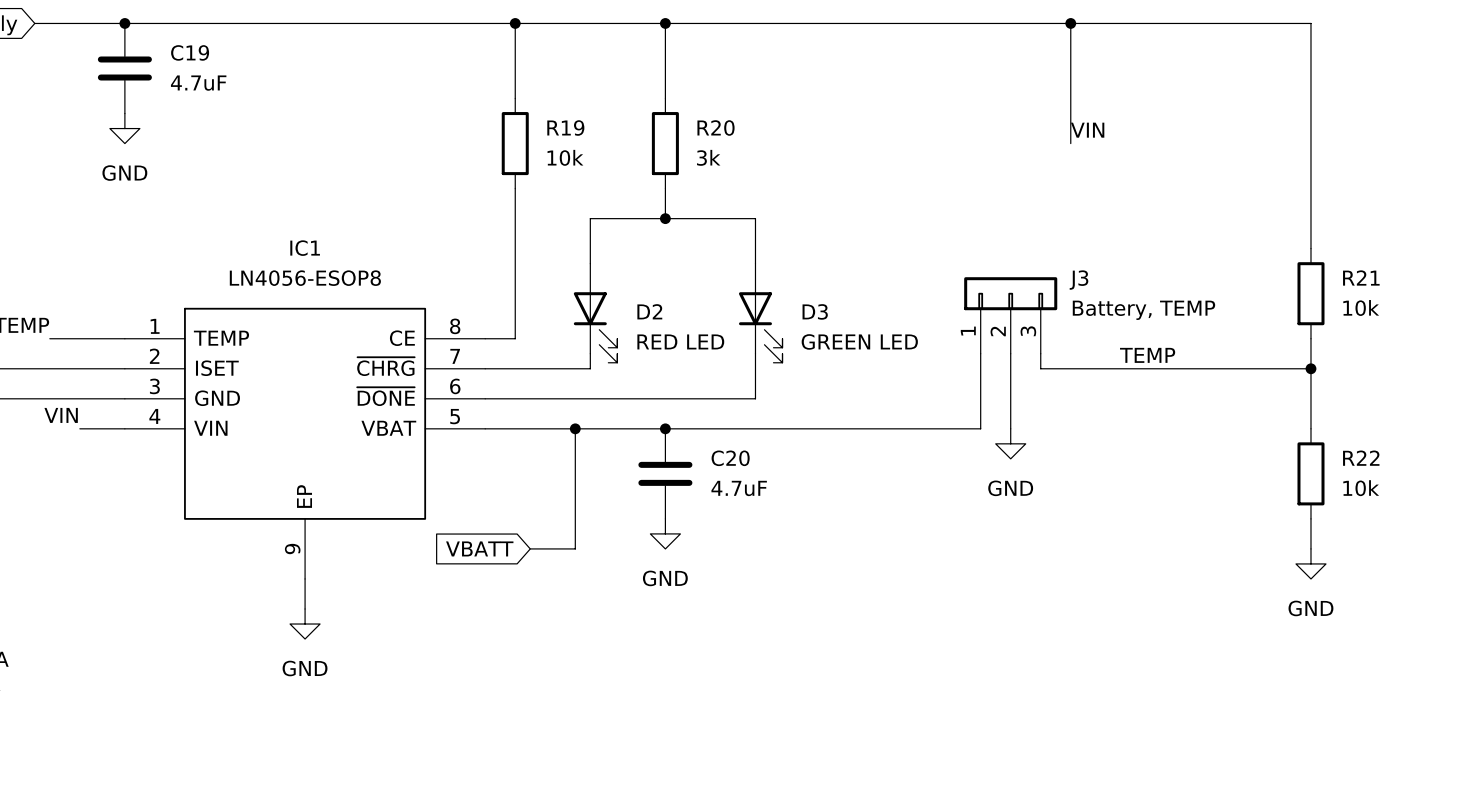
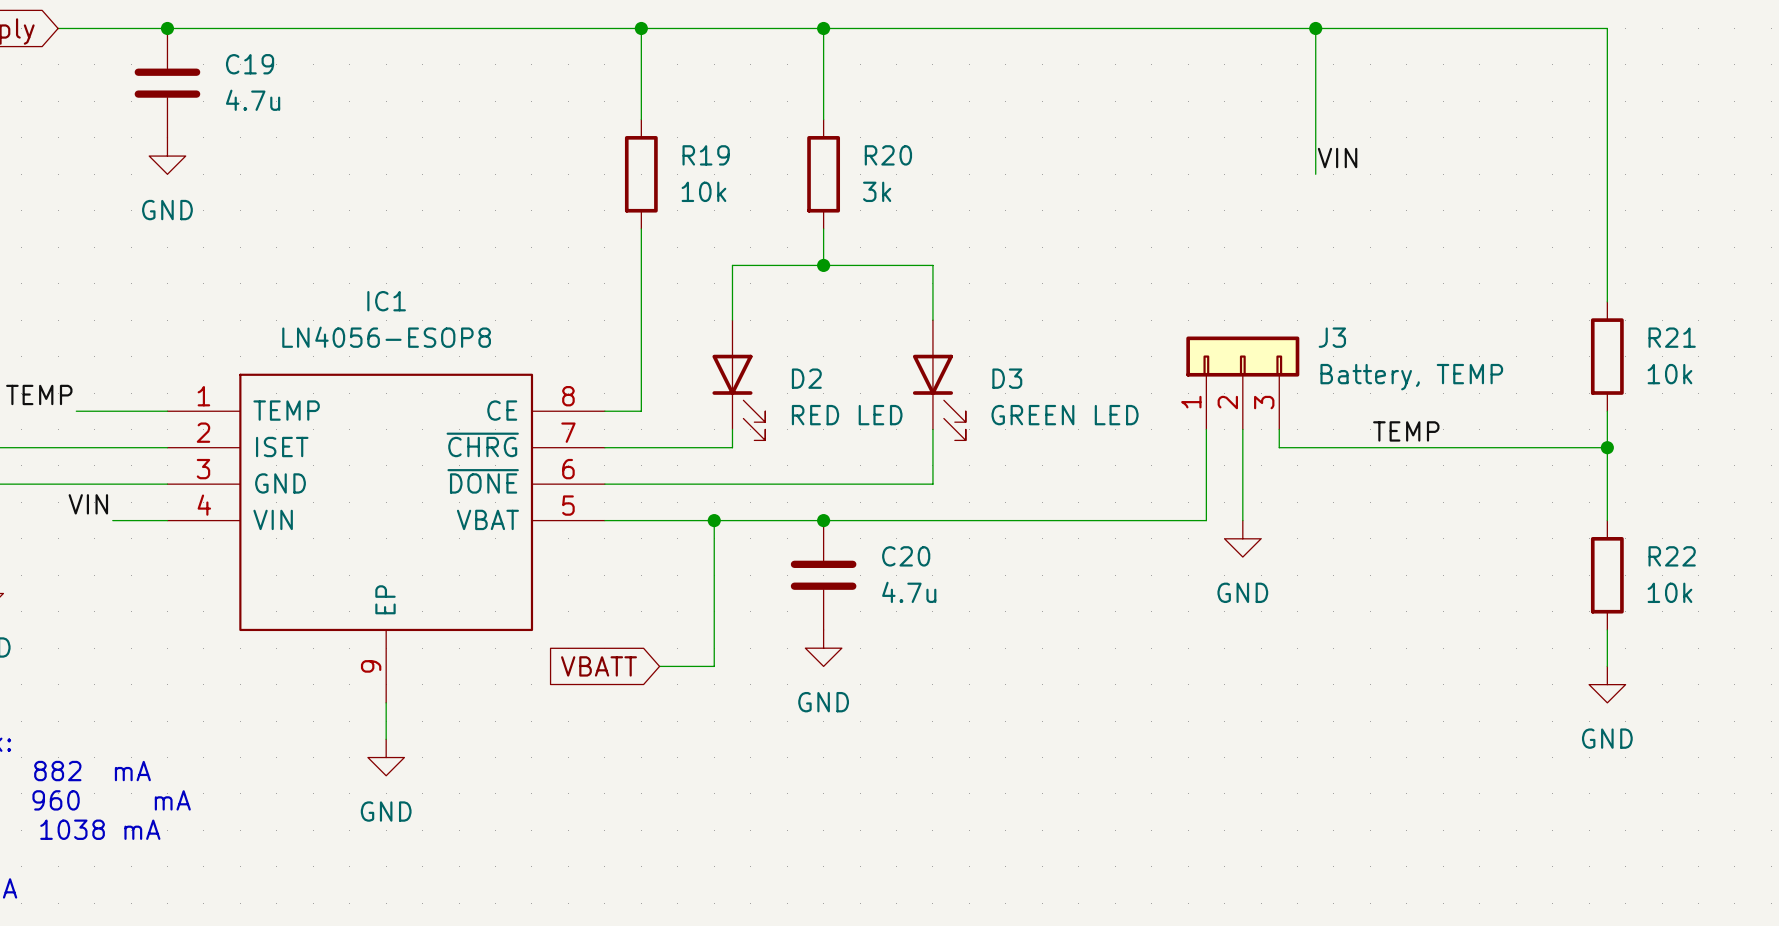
C19 value: 4.7uF (198, 83) -> 4.7u (253, 100)
C20 value: 4.7uF (739, 488) -> 4.7u (909, 592)

